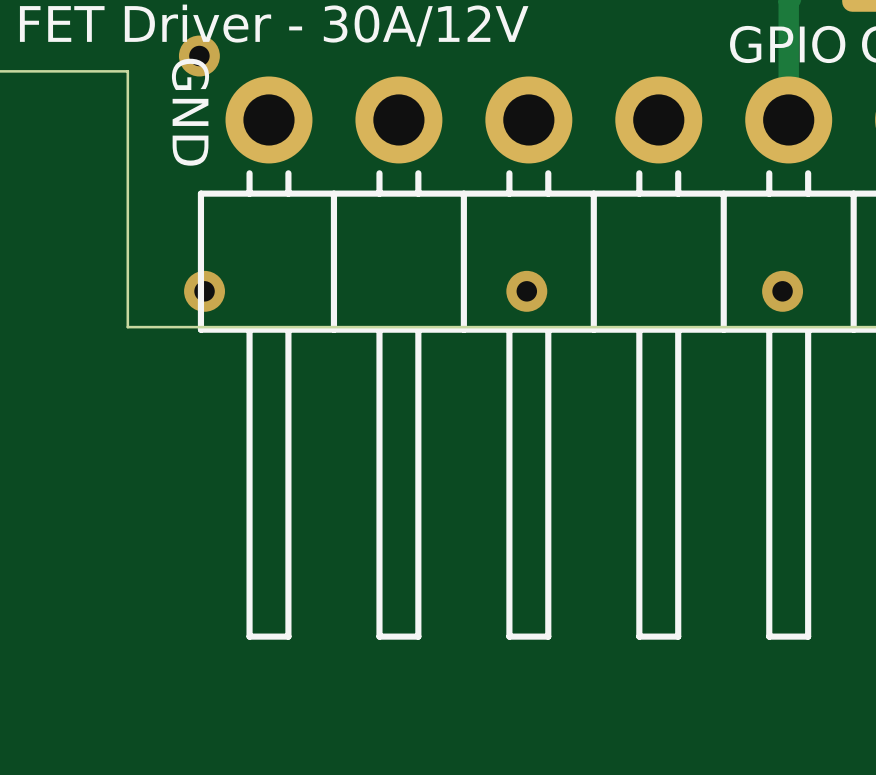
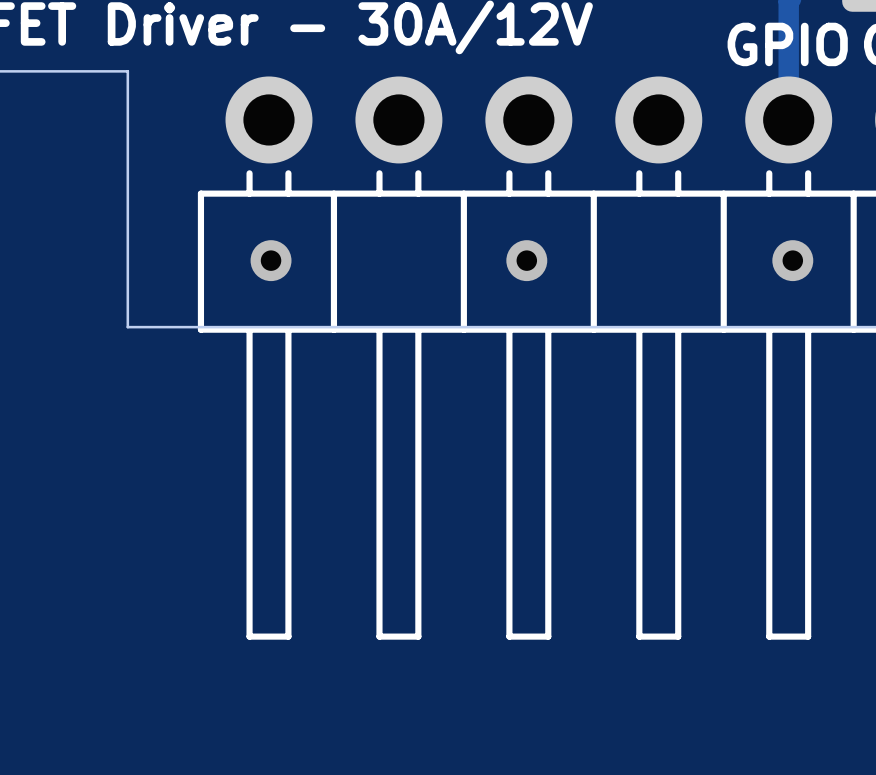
via: (199, 56) -> none
text: GND (190, 112) -> none
via position: (204, 291) -> (271, 260)
via position: (526, 291) -> (526, 260)
via position: (782, 291) -> (792, 260)

